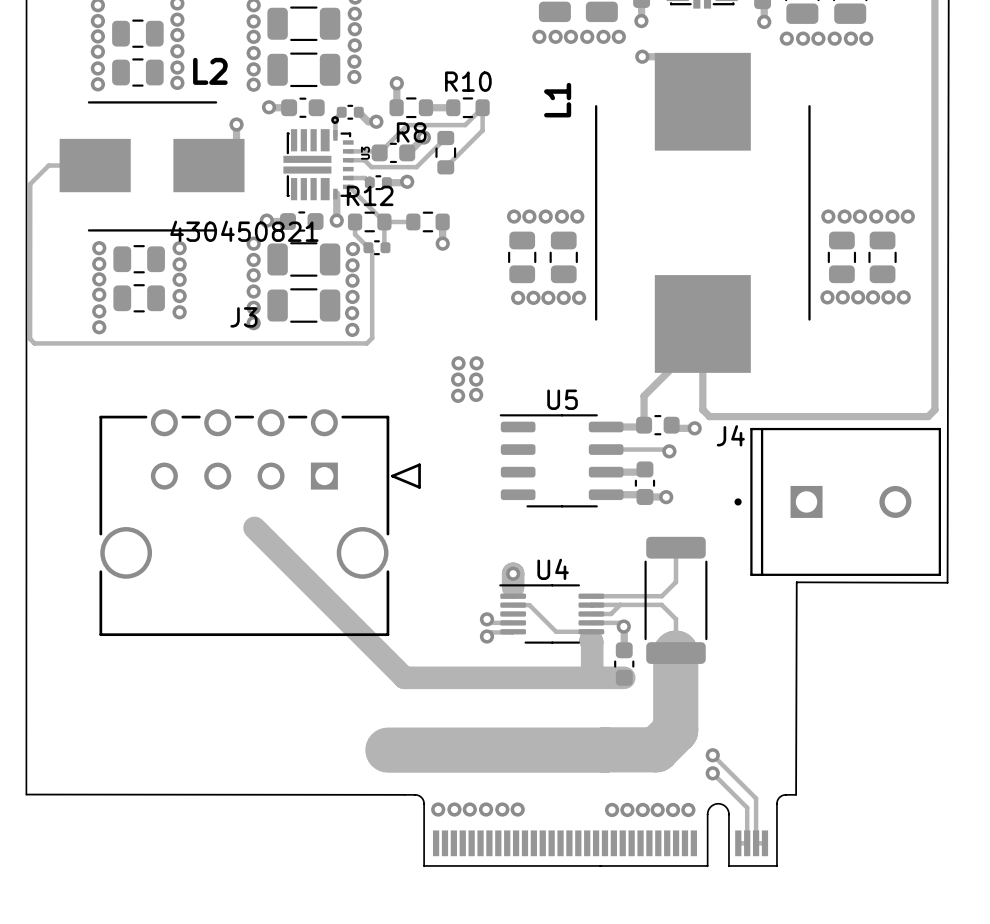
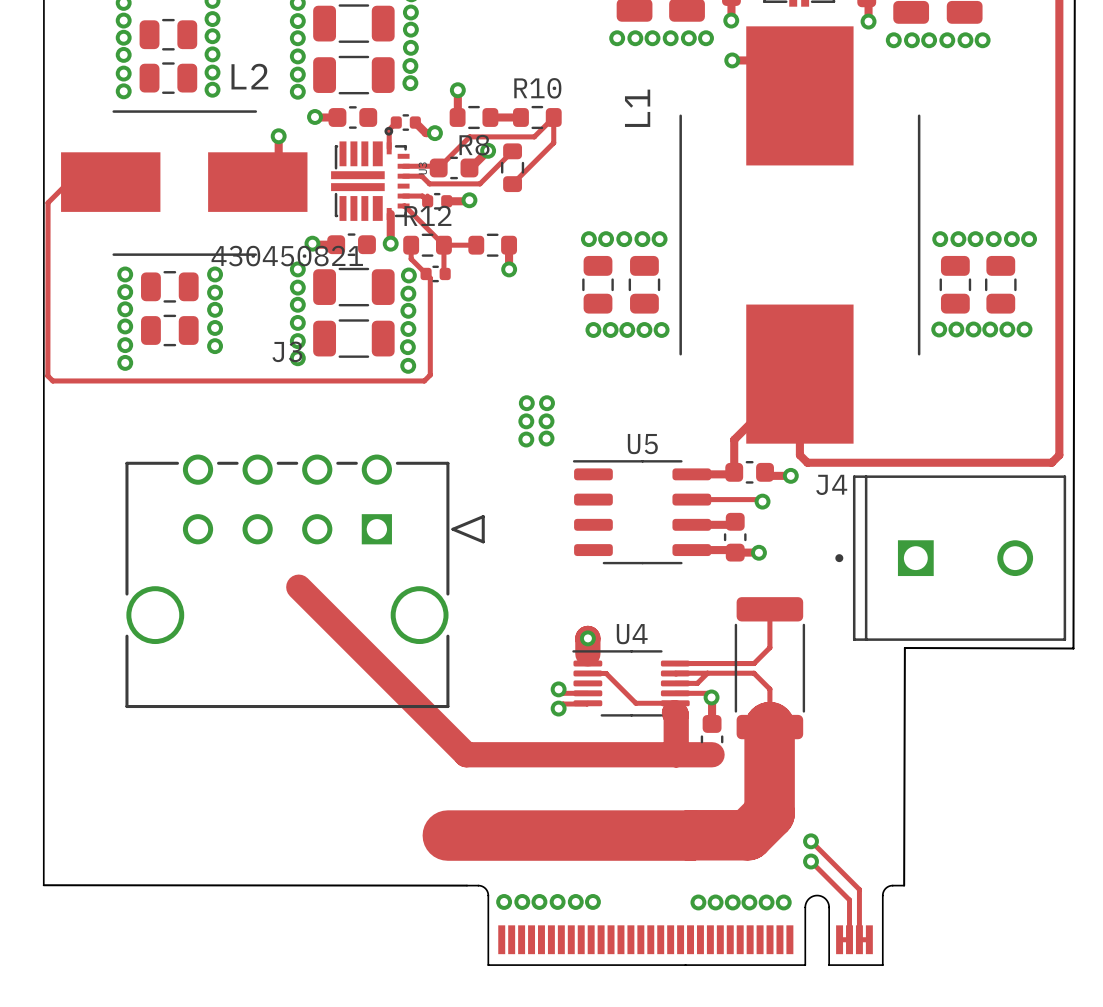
L1 footprint: [595, 52, 811, 373] -> [679, 26, 921, 444]
L2 footprint: [59, 101, 245, 232] -> [61, 110, 308, 256]

